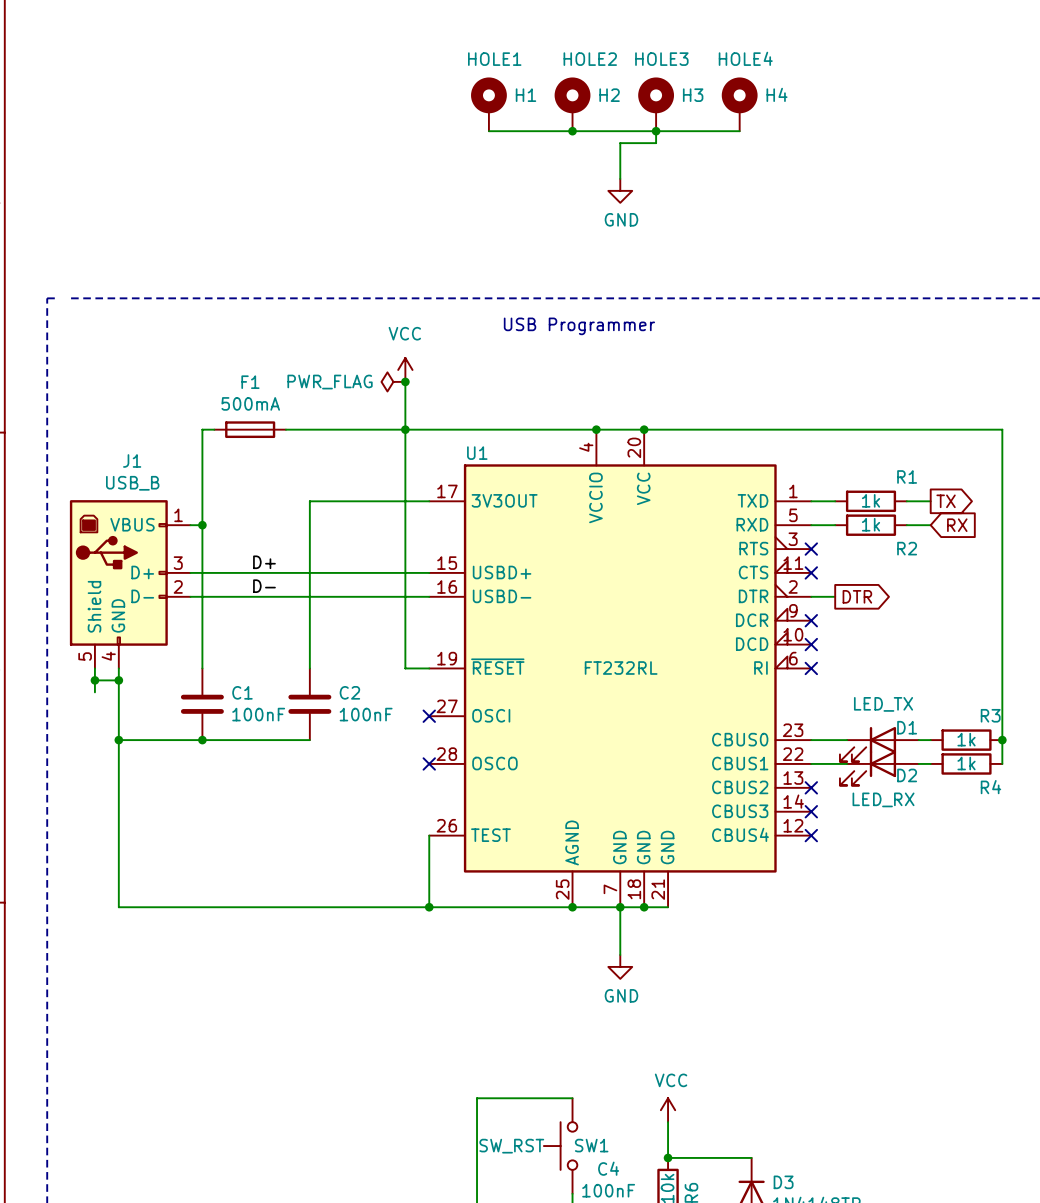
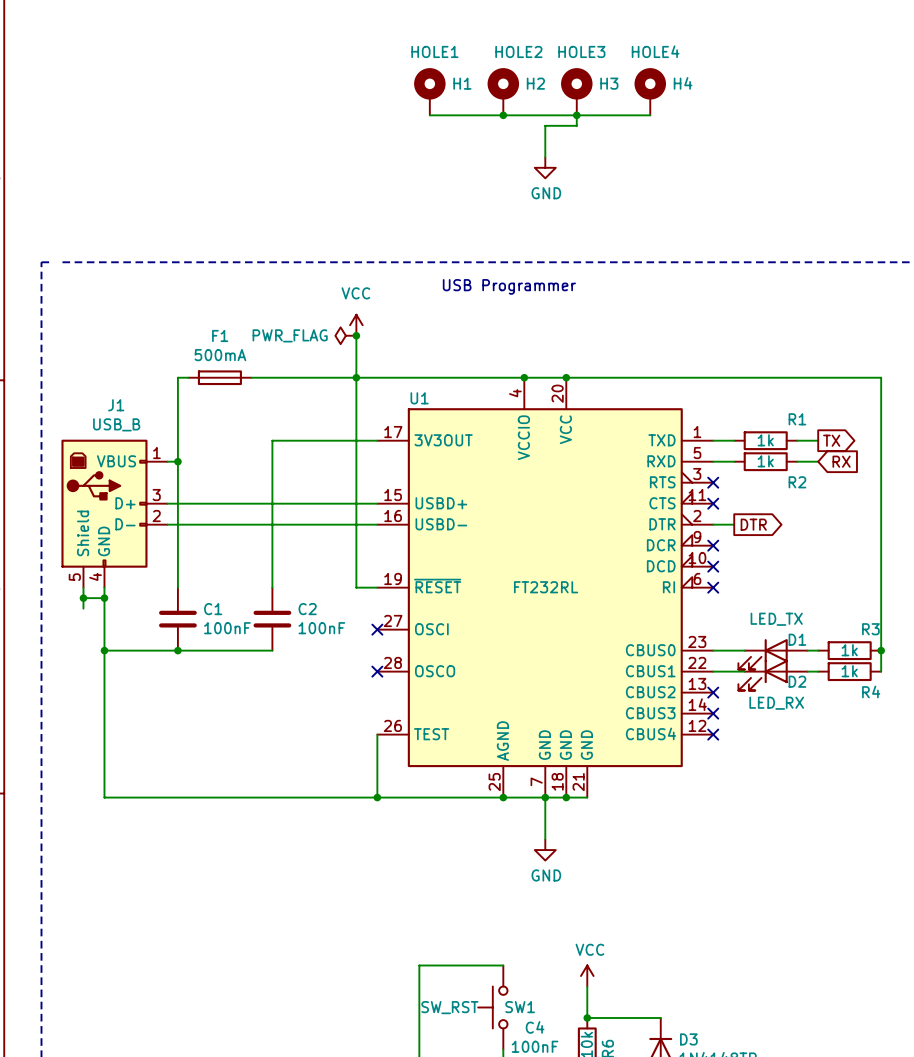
label: D+ (264, 562) -> none
label: D- (264, 586) -> none

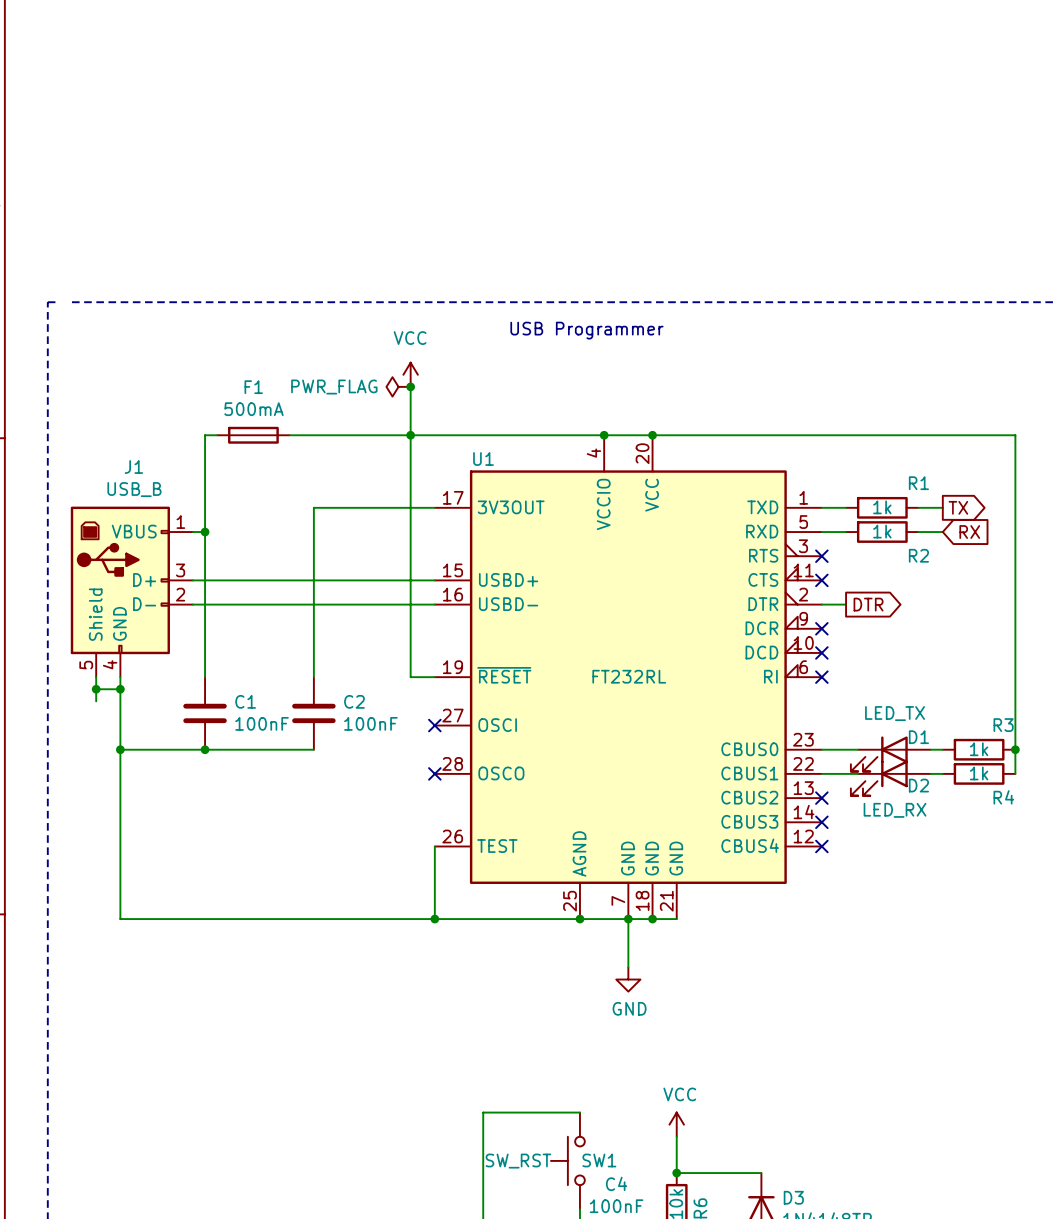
H1: HOLE1 (429, 91) -> none
H2: HOLE2 (503, 91) -> none
H3: HOLE3 (576, 91) -> none
H4: HOLE4 (650, 91) -> none
wire: (429, 115) (650, 115) -> none
junction: (503, 115) -> none
wire: (576, 115) (576, 125) (545, 125) (545, 157) -> none
junction: (576, 115) -> none
power symbol: GND (545, 167) -> none

